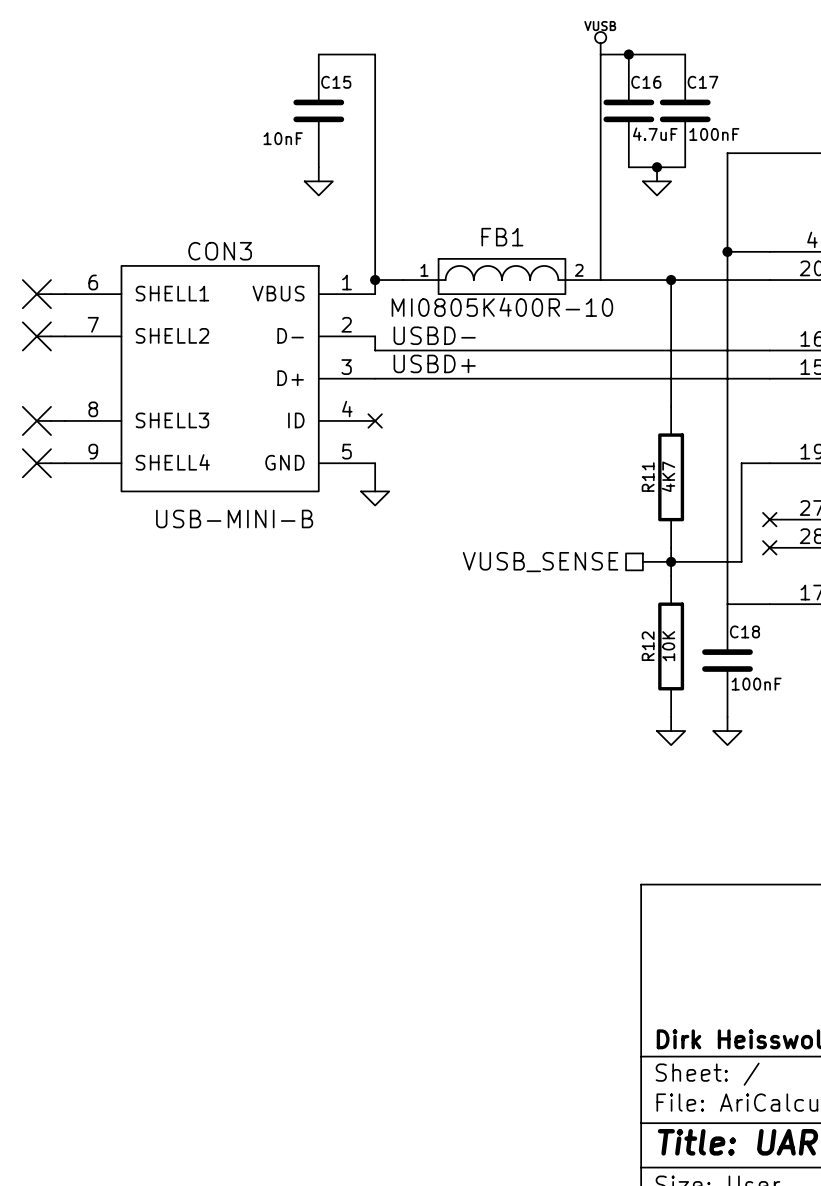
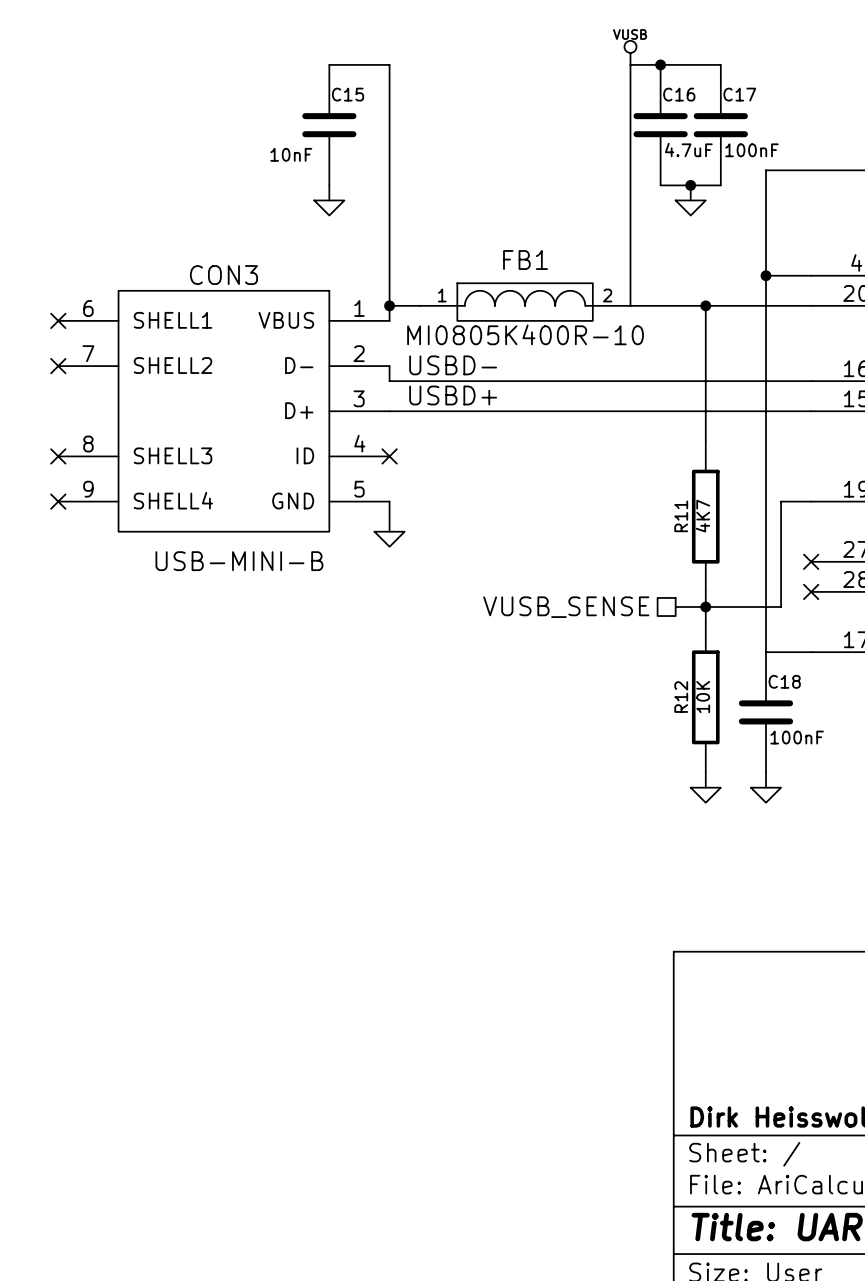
part: (36, 294) -> none
wire: (51, 294) (65, 294) -> none
no-connect mark: none -> (58, 320)
part: (36, 336) -> none
wire: (51, 336) (65, 336) -> none
no-connect mark: none -> (58, 366)
part: (36, 420) -> none
wire: (51, 420) (65, 420) -> none
no-connect mark: none -> (58, 456)
part: (36, 463) -> none
wire: (51, 463) (65, 463) -> none
no-connect mark: none -> (58, 501)

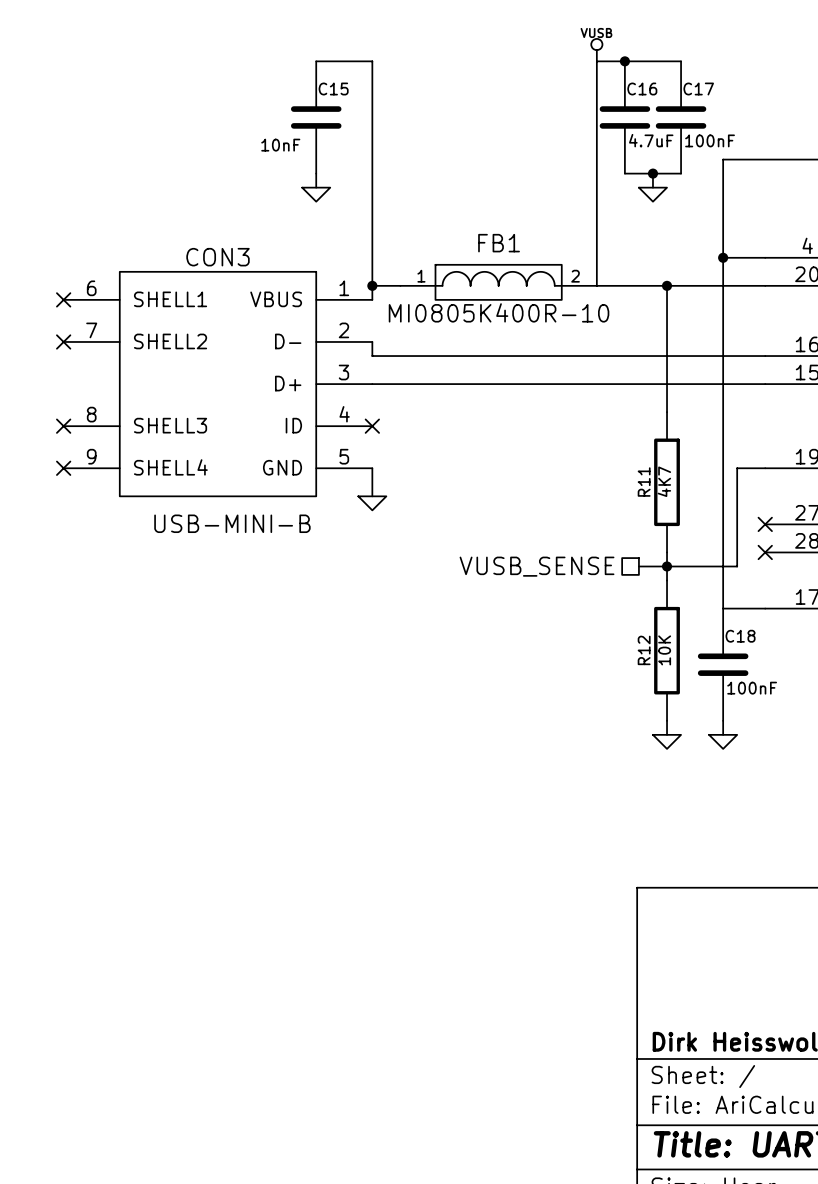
label: USBD- (453, 365) -> none
label: USBD+ (453, 395) -> none

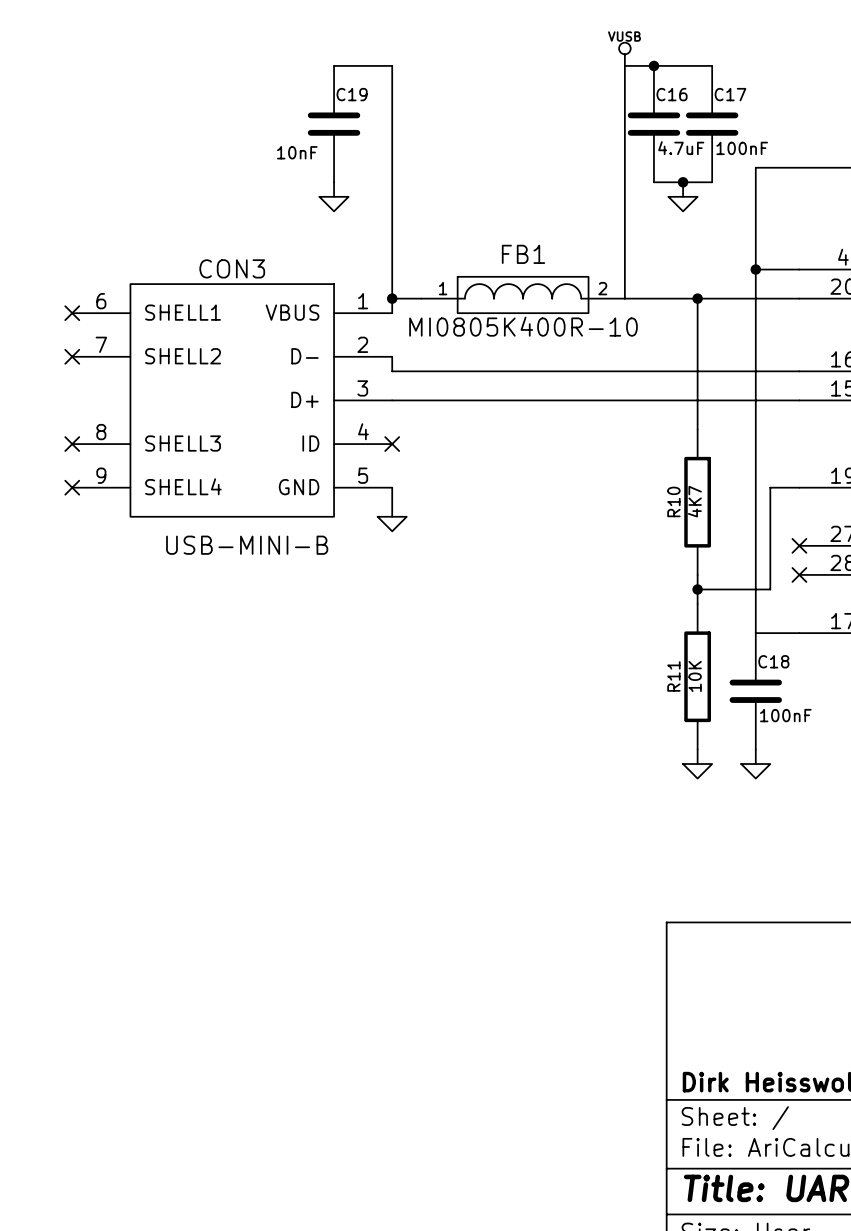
C15 name: C15 (333, 89) -> C19 (352, 94)
R11 name: R11 (644, 482) -> R10 (673, 501)
hierarchical label: VUSB_SENSE (537, 566) -> none
wire: (638, 566) (667, 566) -> none
R12 name: R12 (644, 650) -> R11 (673, 676)

